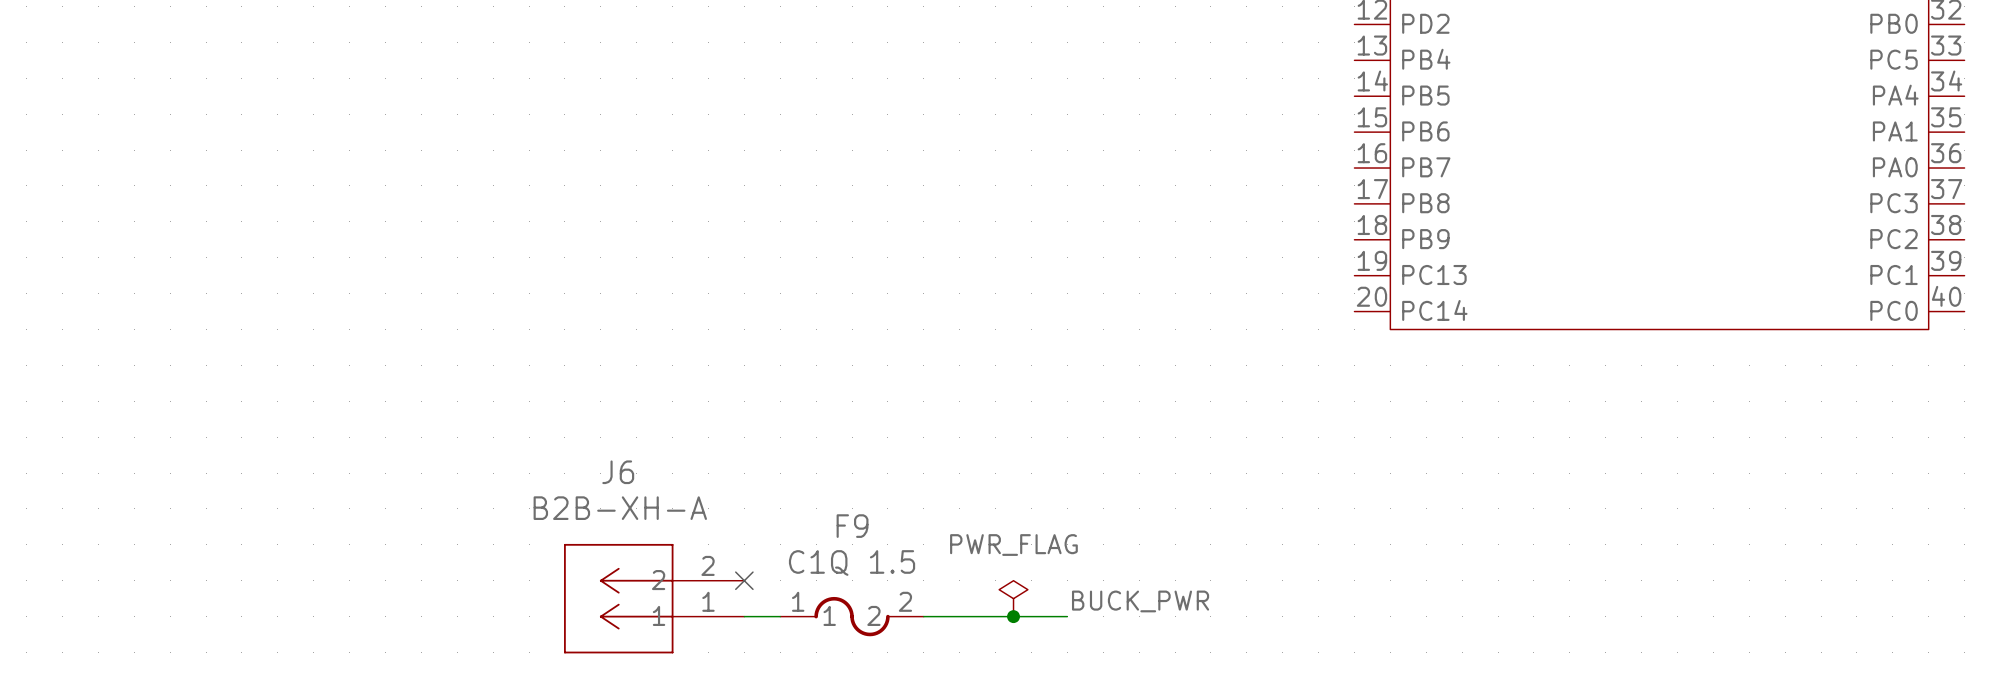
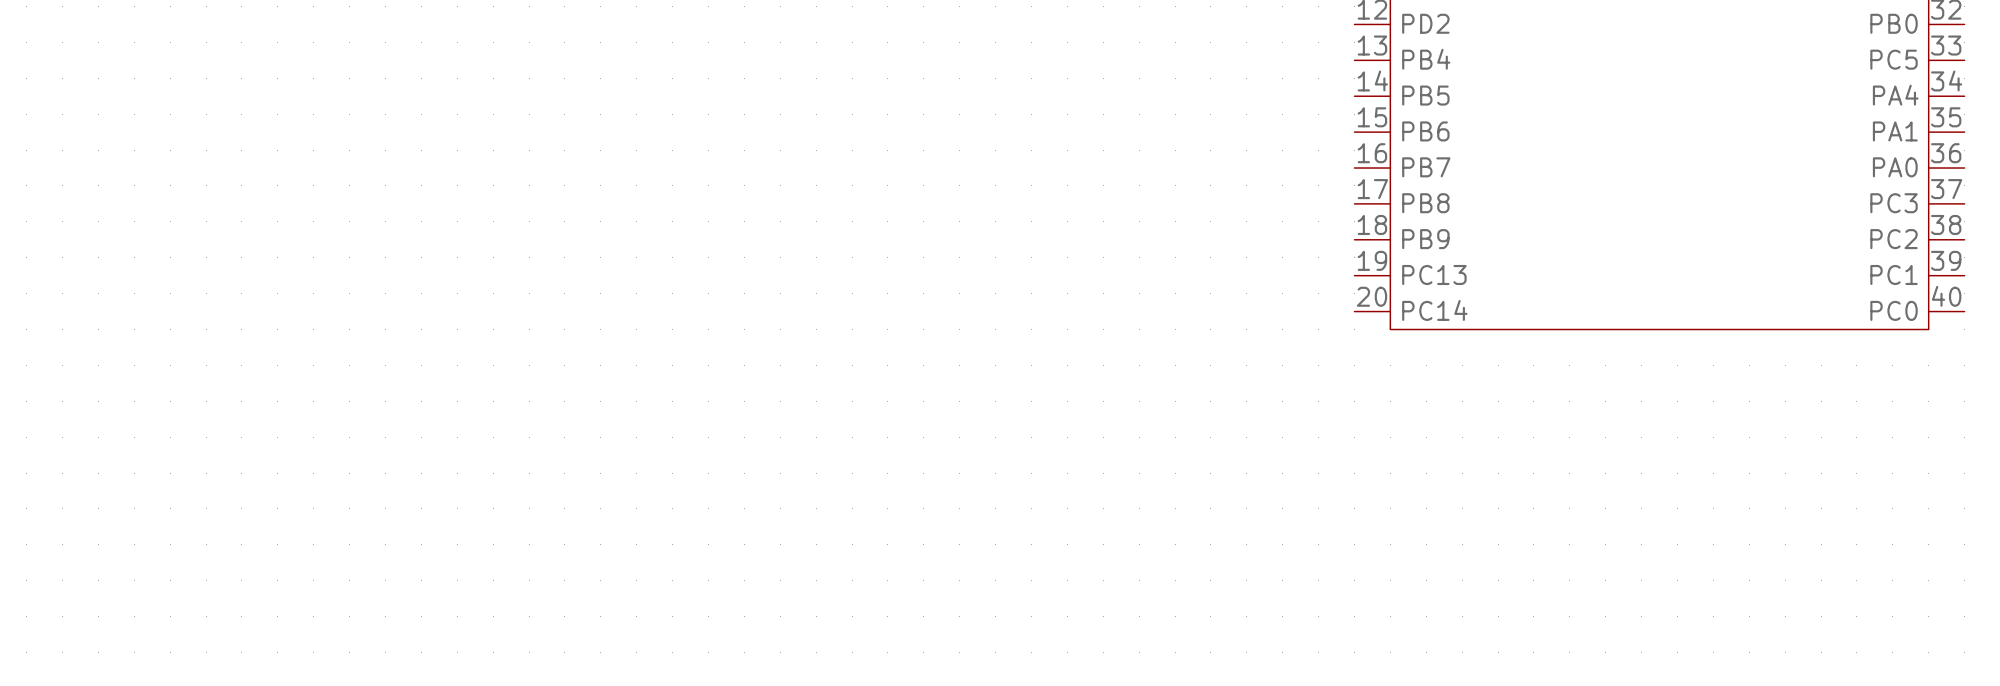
no-connect mark: (744, 580) -> none
J6: B2B-XH-A (654, 598) -> none
power symbol: PWR_FLAG (1013, 598) -> none
label: BUCK_PWR (1140, 601) -> none
wire: (744, 616) (780, 616) -> none
F9: C1Q 1.5 (852, 616) -> none
wire: (923, 616) (1067, 616) -> none
junction: (1013, 616) -> none

